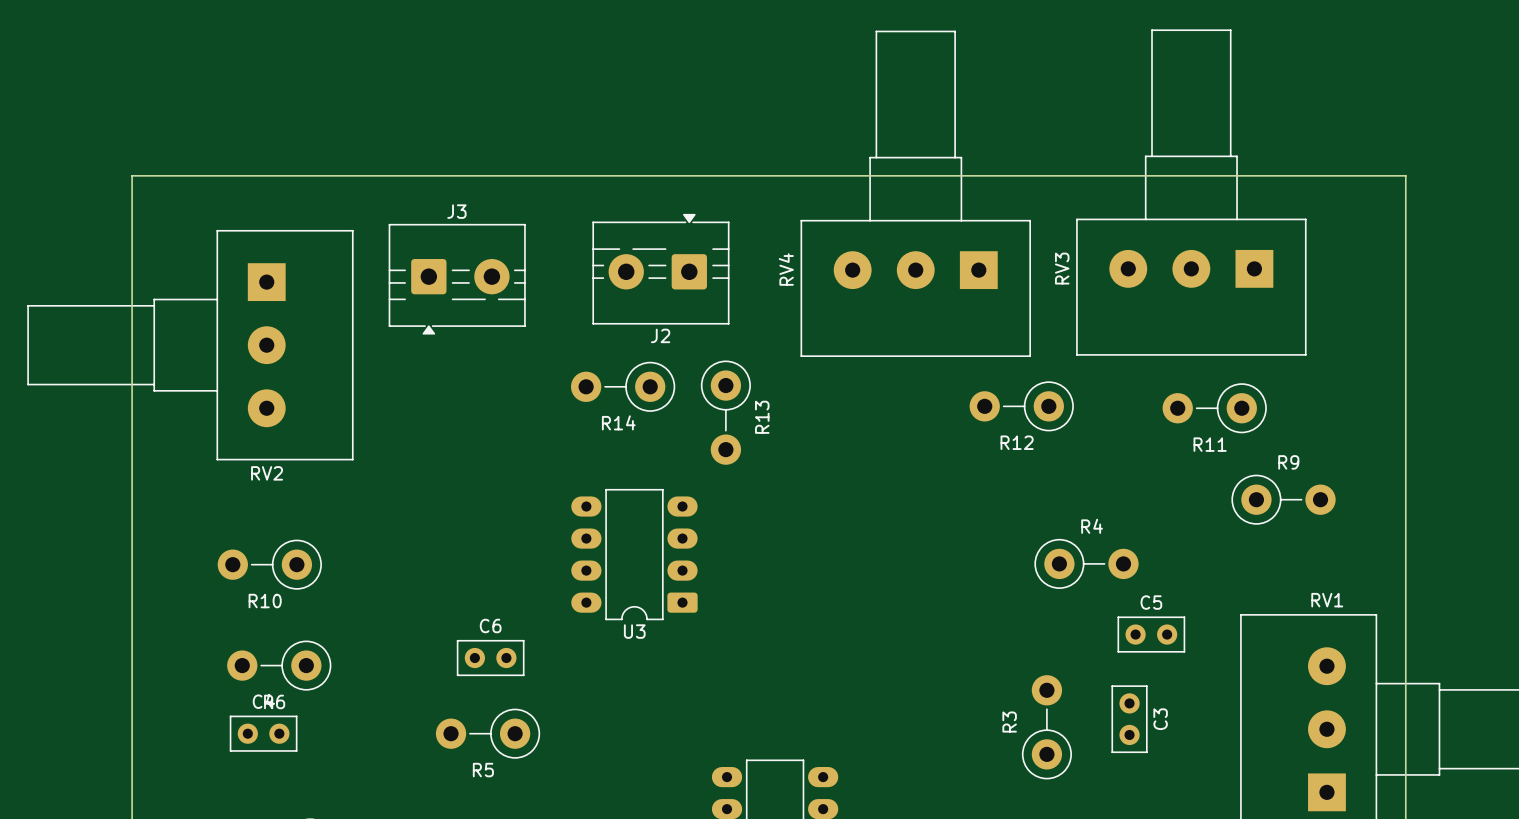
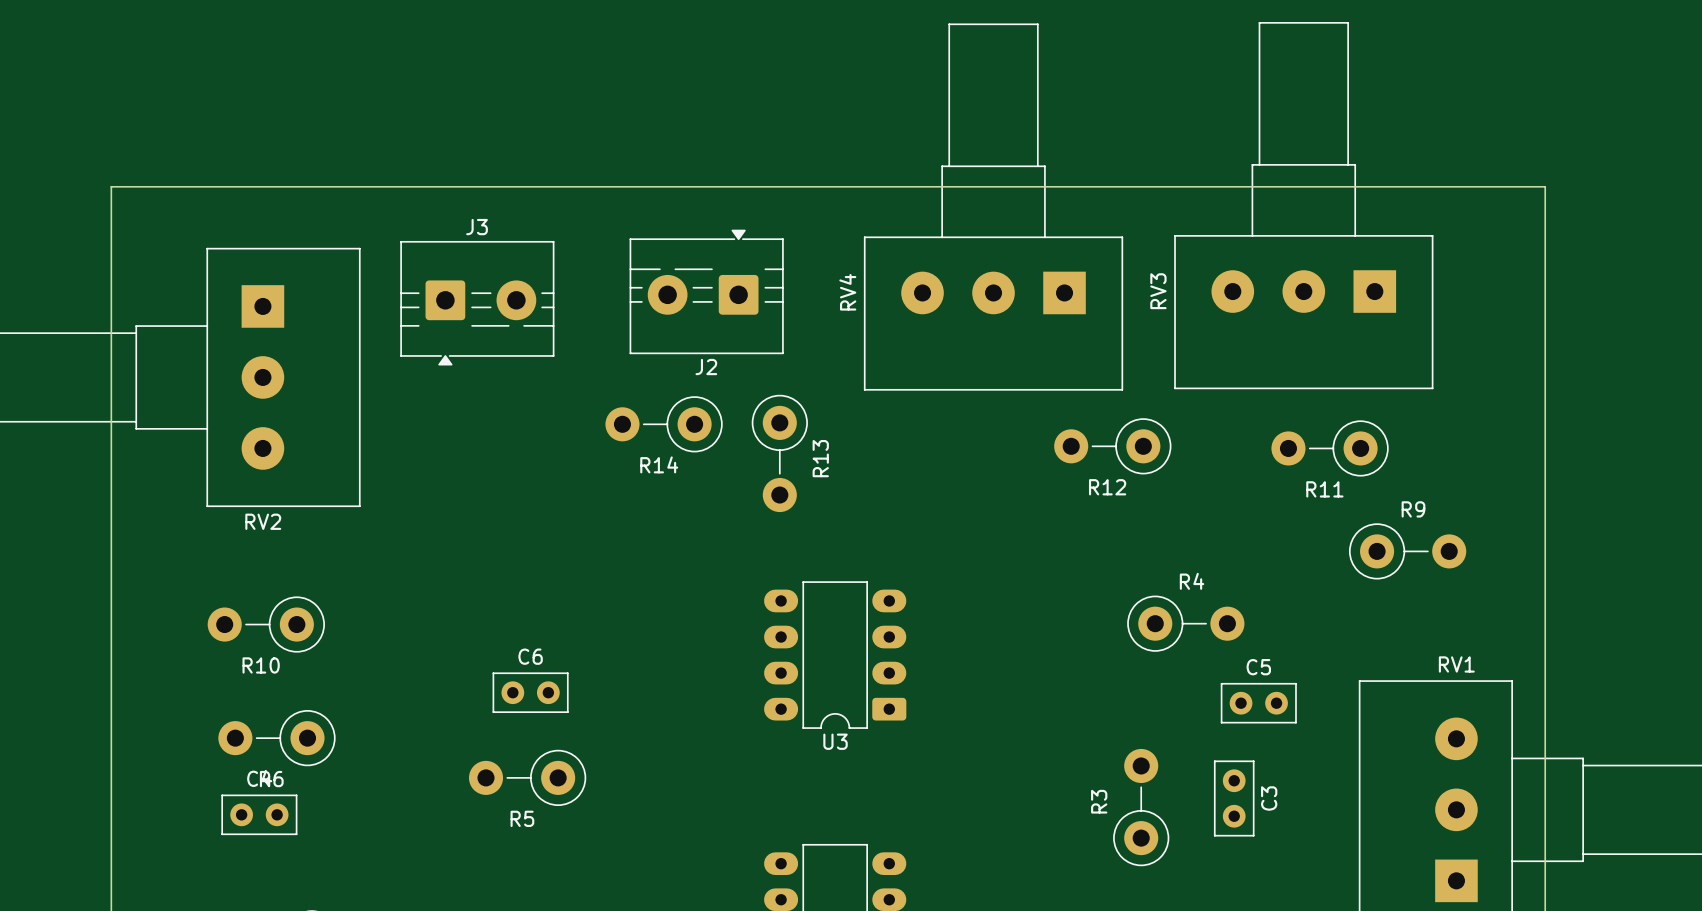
U3 position: (634, 554) -> (835, 655)
C6 position: (490, 658) -> (530, 692)
R5 position: (487, 733) -> (527, 777)

